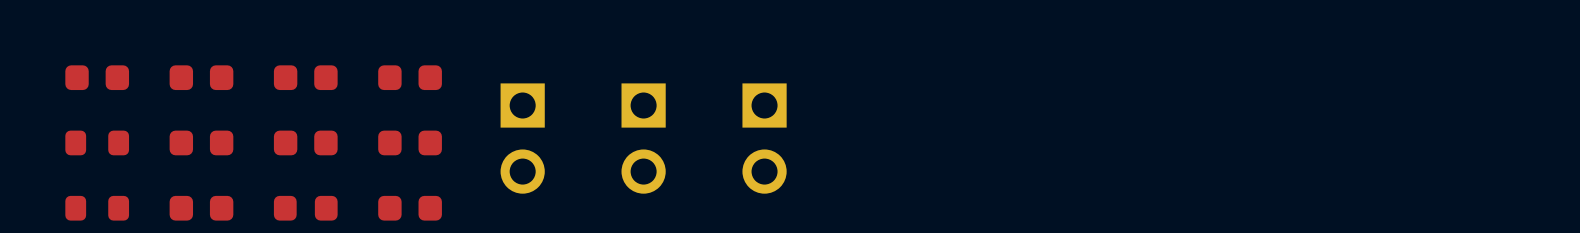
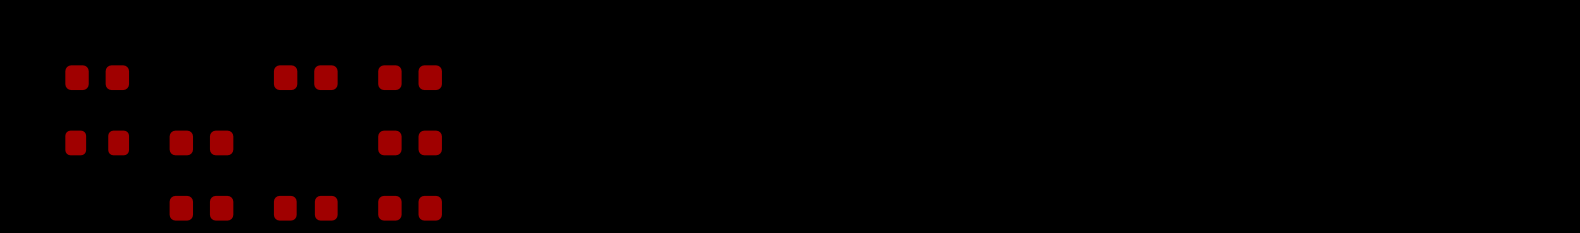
part: (201, 77) -> none
part: (522, 138) -> none
part: (643, 138) -> none
part: (764, 138) -> none
part: (305, 142) -> none
part: (97, 208) -> none

